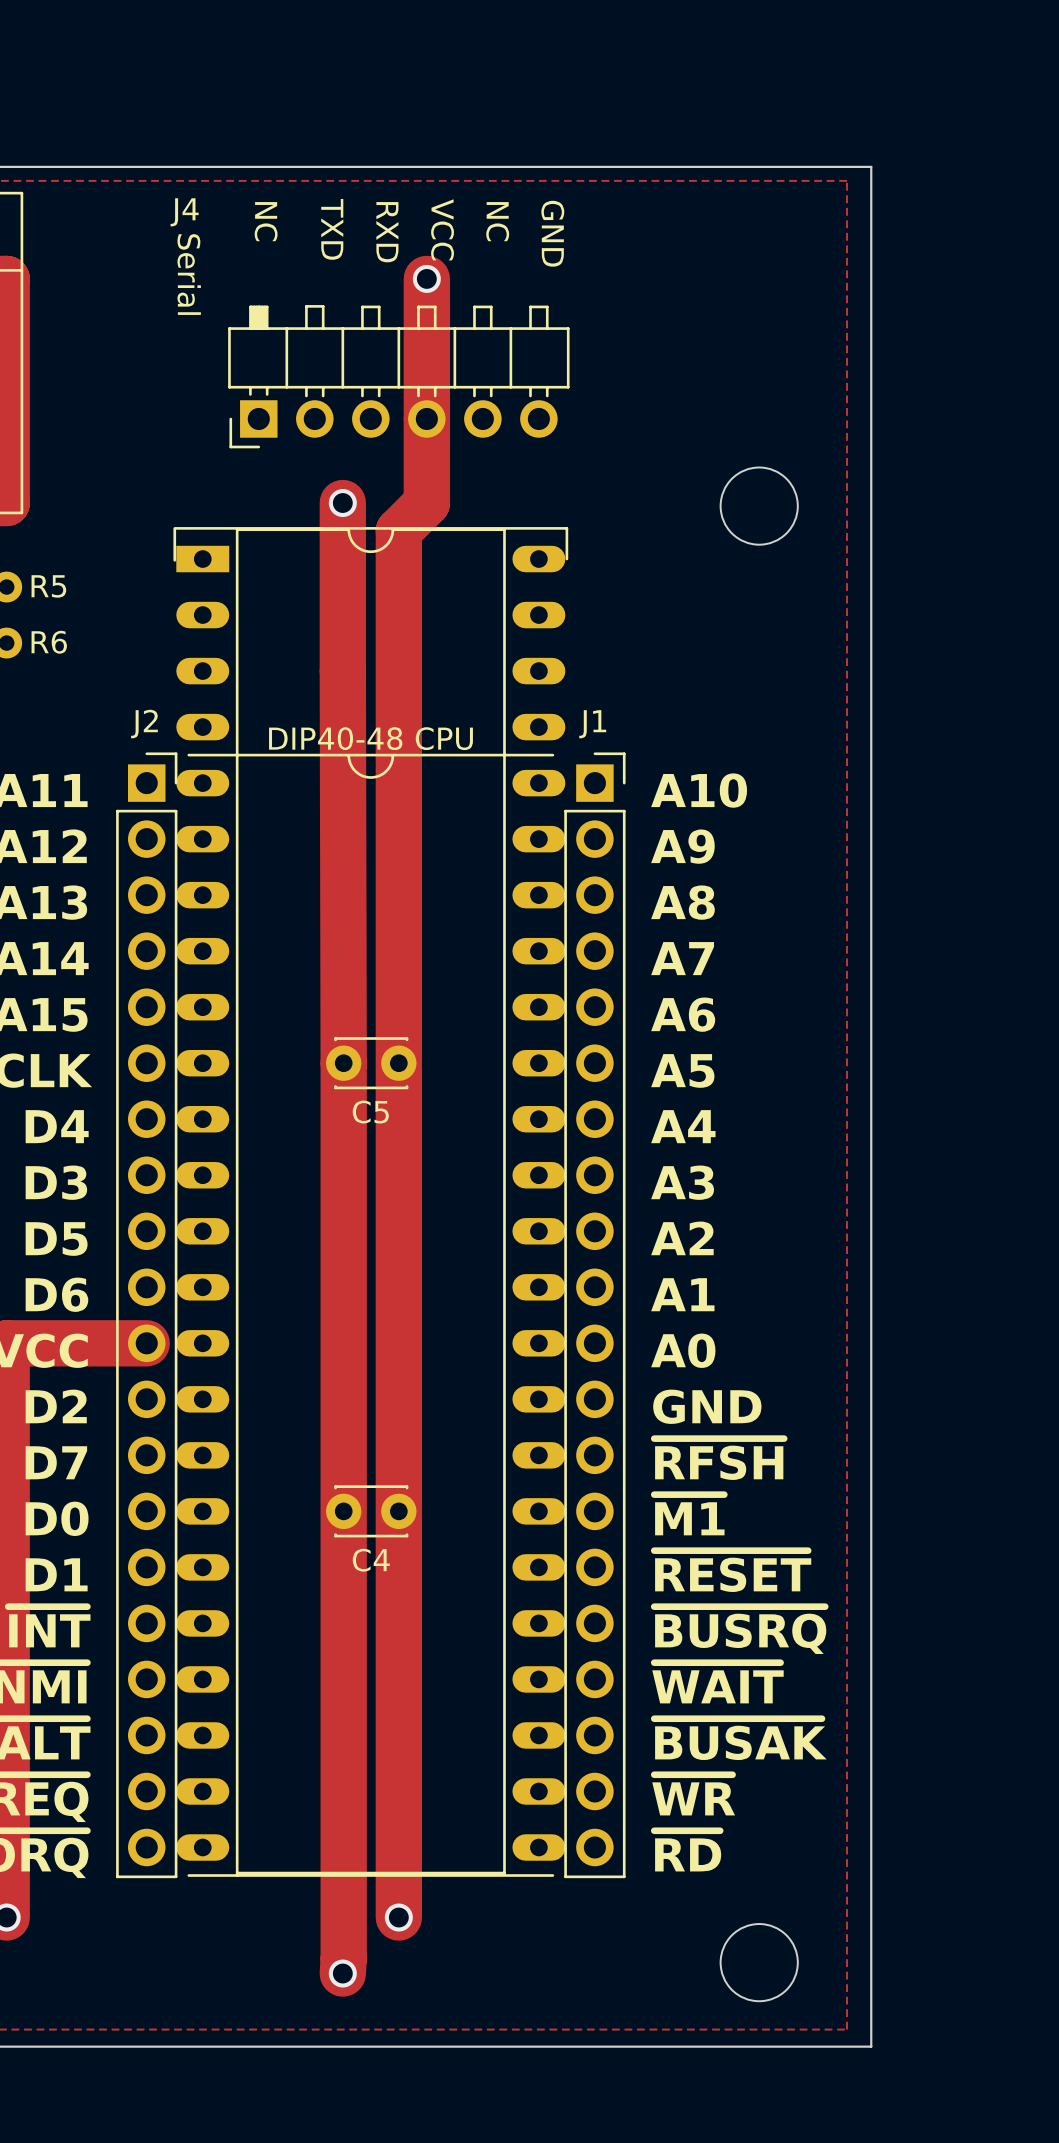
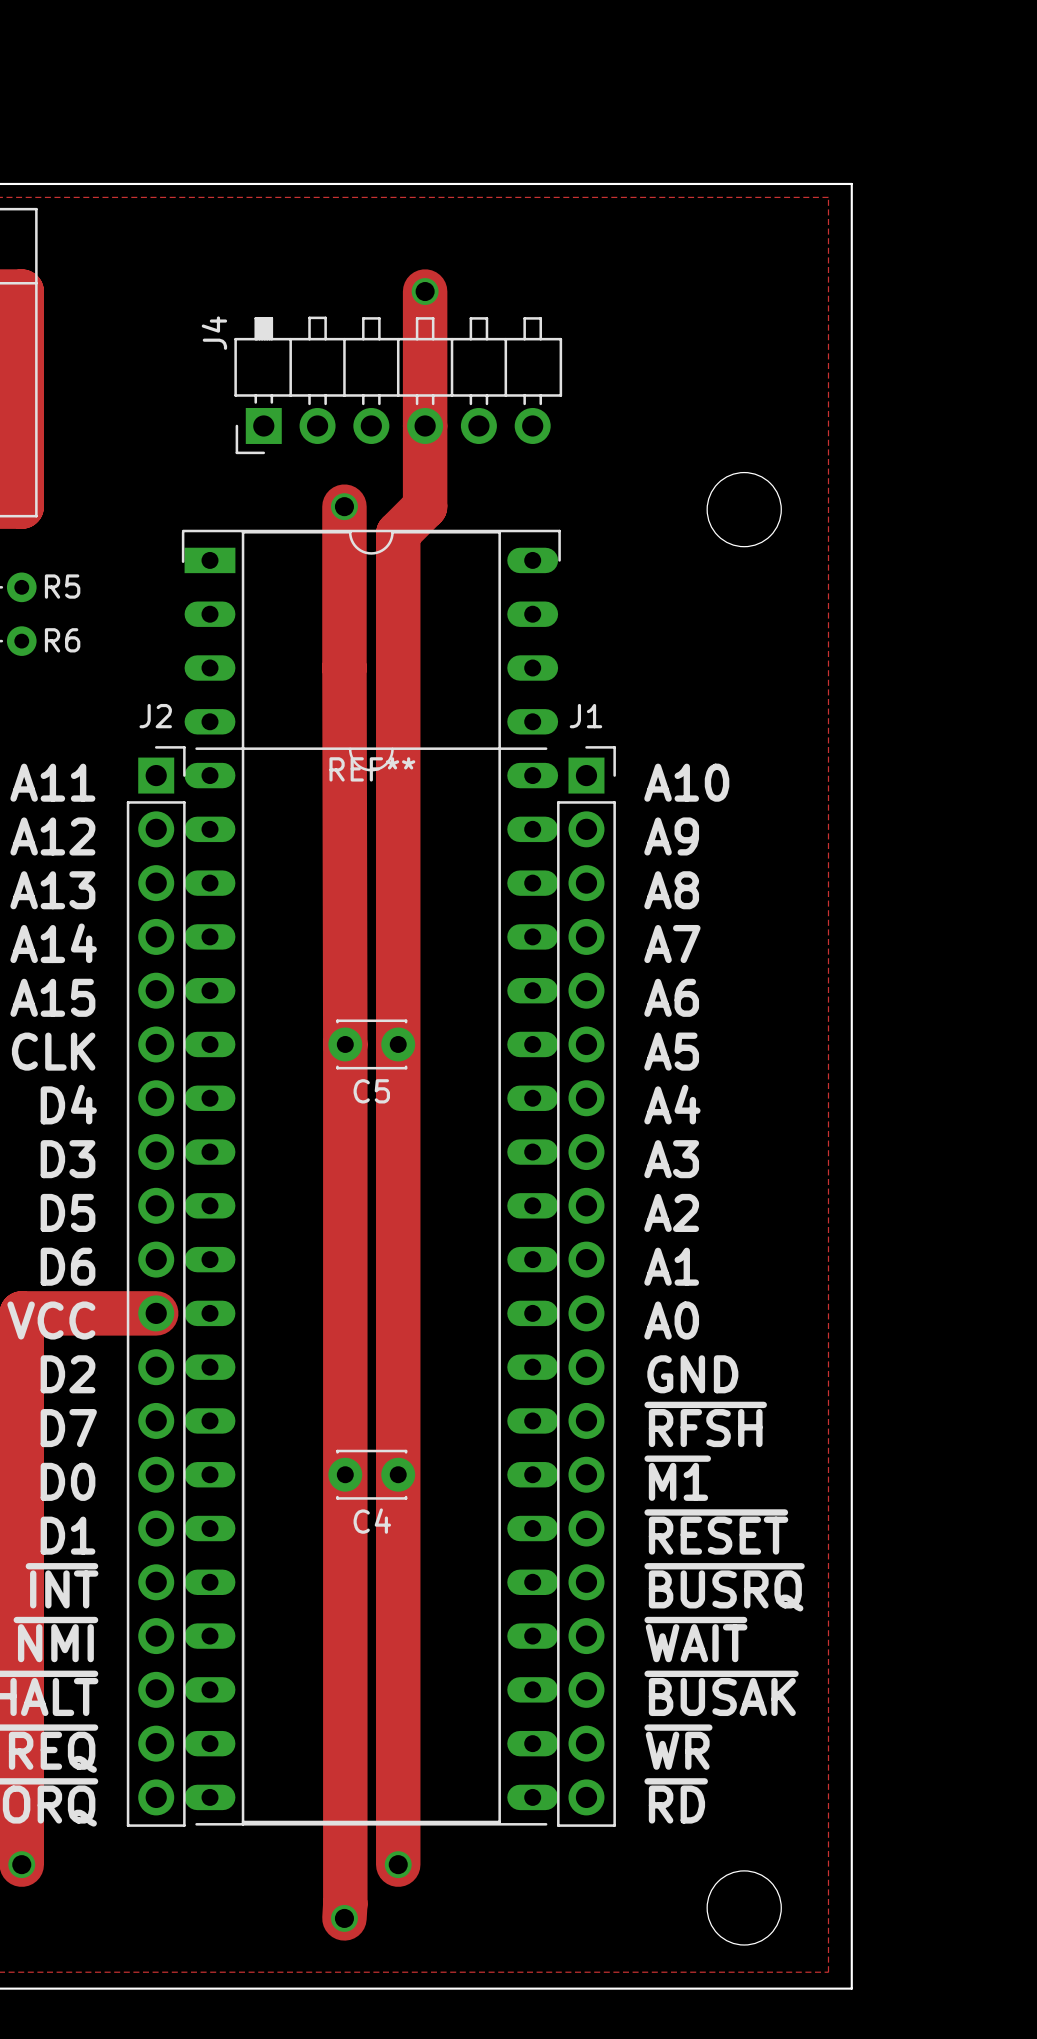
J4 name rotation: 0° (184, 212) -> 90° counterclockwise (214, 333)
J4 name position: J4 (184, 212) -> J4 (214, 333)
text: NC (266, 221) -> none
text: NC (497, 221) -> none
text: TXD (332, 229) -> none
text: VCC (442, 229) -> none
text: RXD (387, 232) -> none
text: GND (552, 233) -> none
text: Serial (189, 274) -> none
DIP40-48 CPU name: DIP40-48 CPU (370, 738) -> REF** (372, 769)

